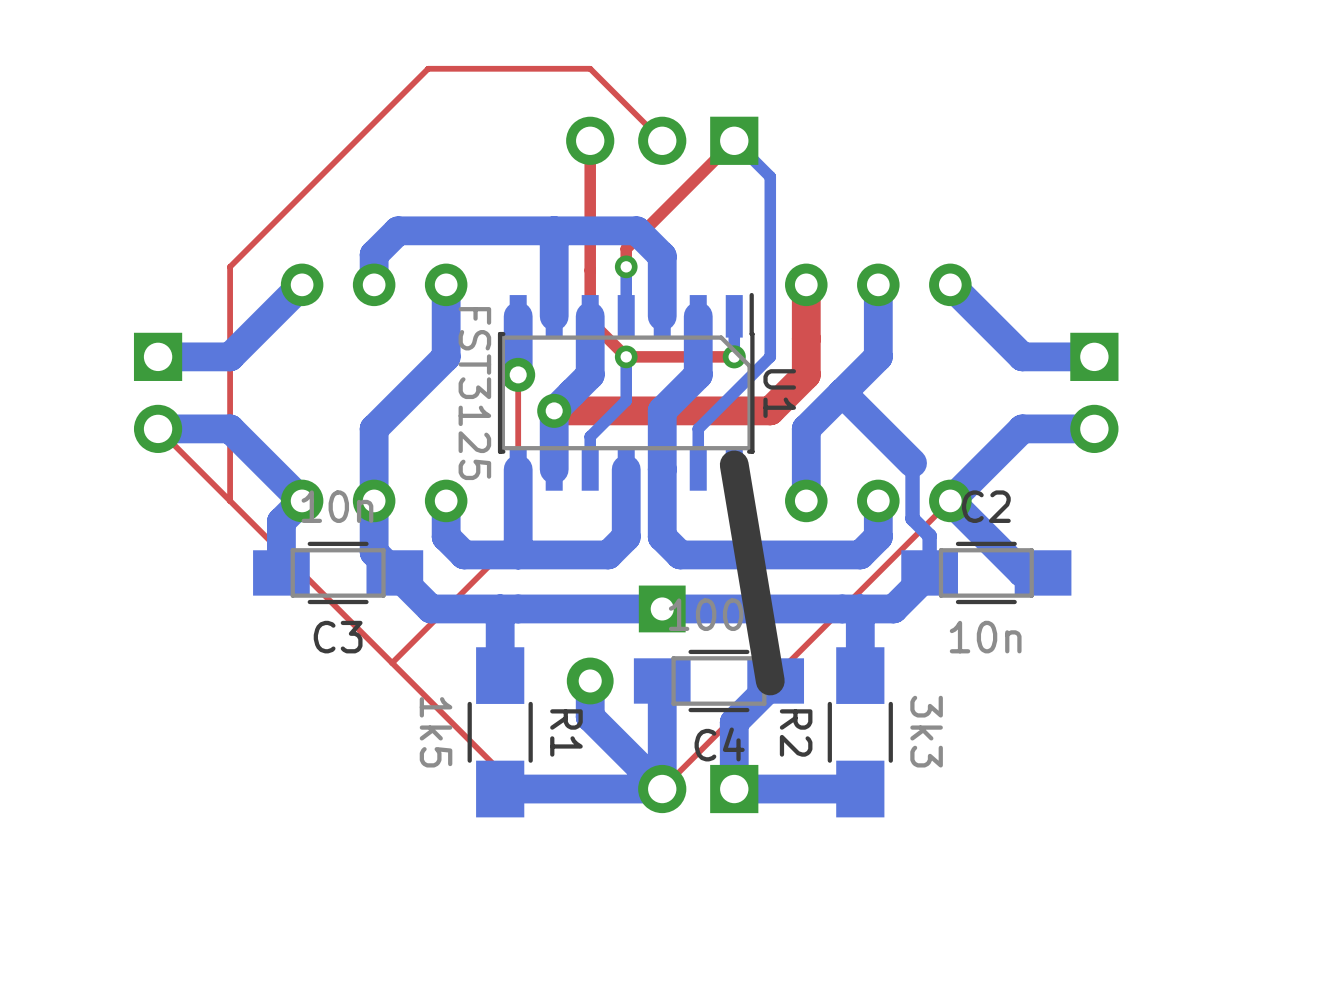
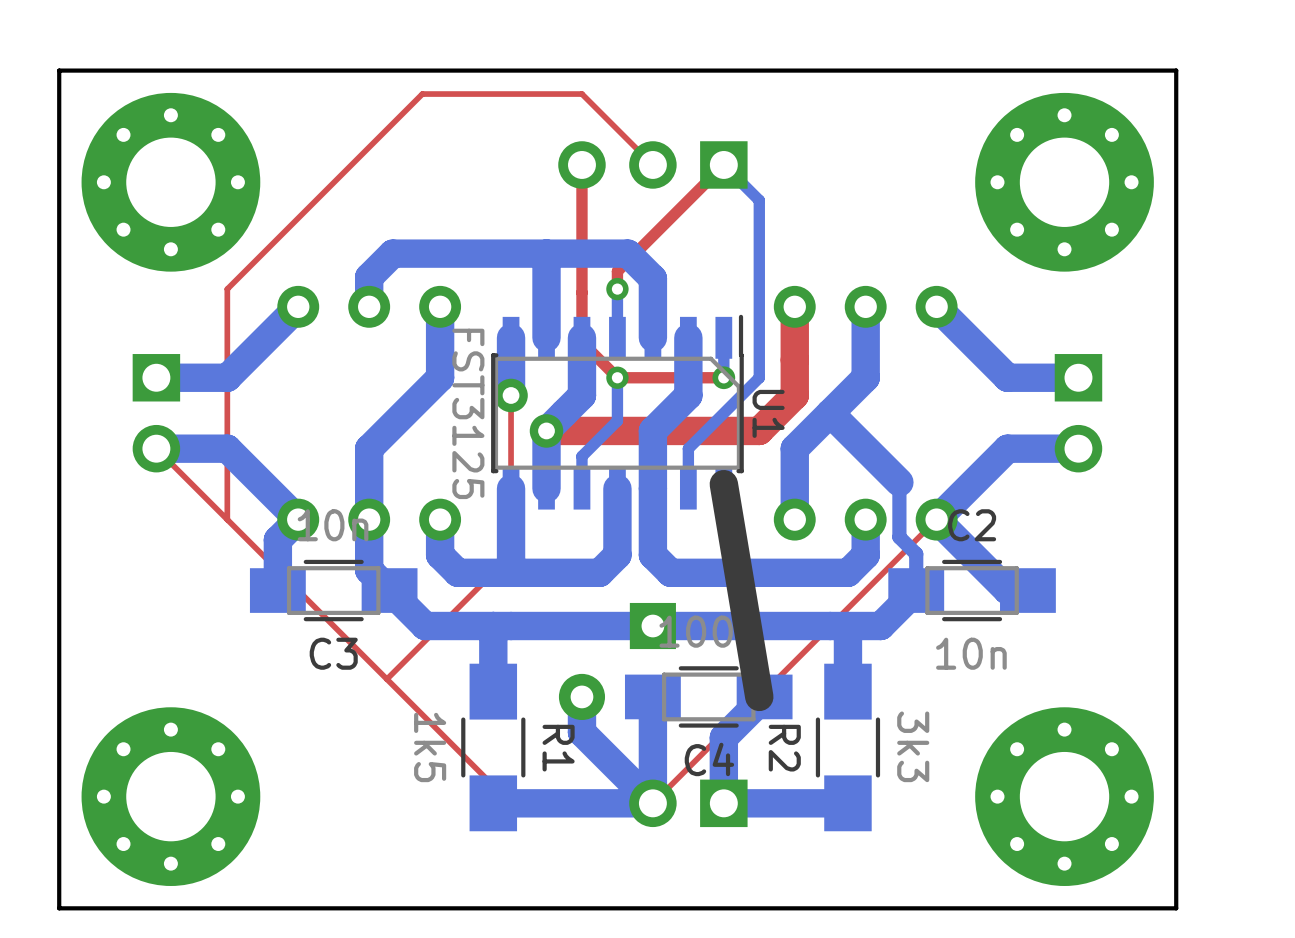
board edge: none -> (1176, 70) (1176, 908) (59, 908) (59, 70) (1176, 70)
part: none -> (170, 182)
part: none -> (1064, 182)
part: none -> (170, 796)
part: none -> (1064, 796)

